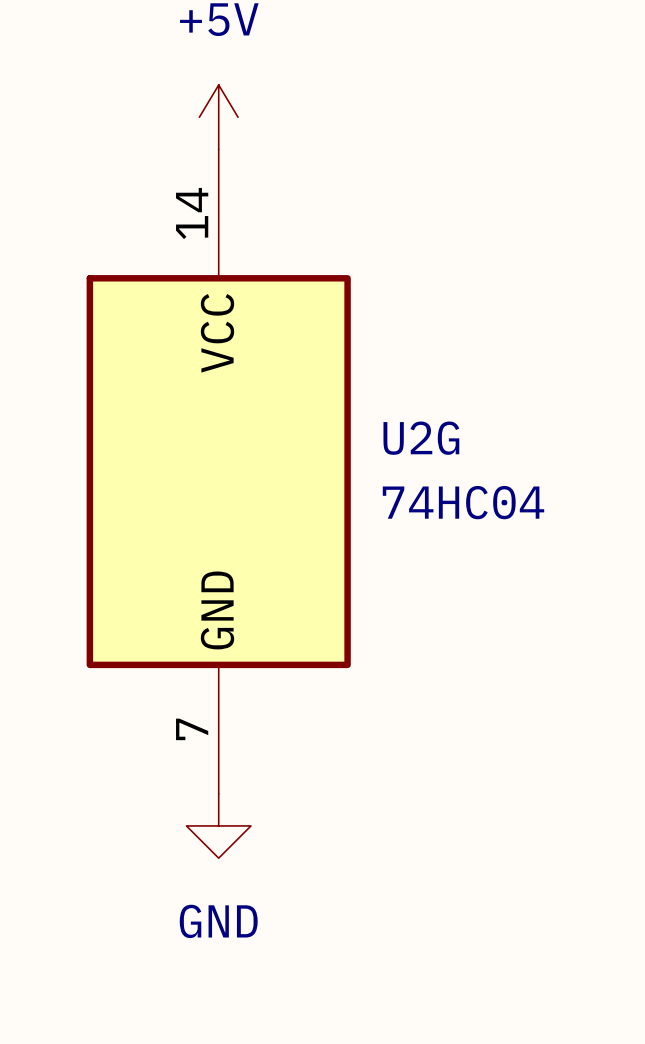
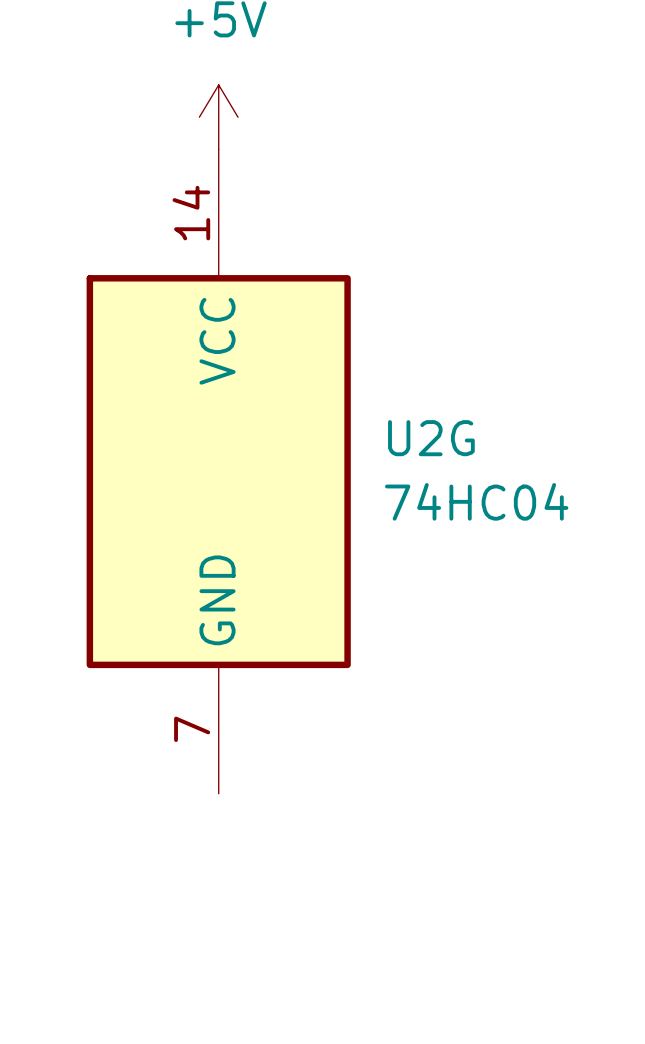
power symbol: GND (218, 825) -> none

